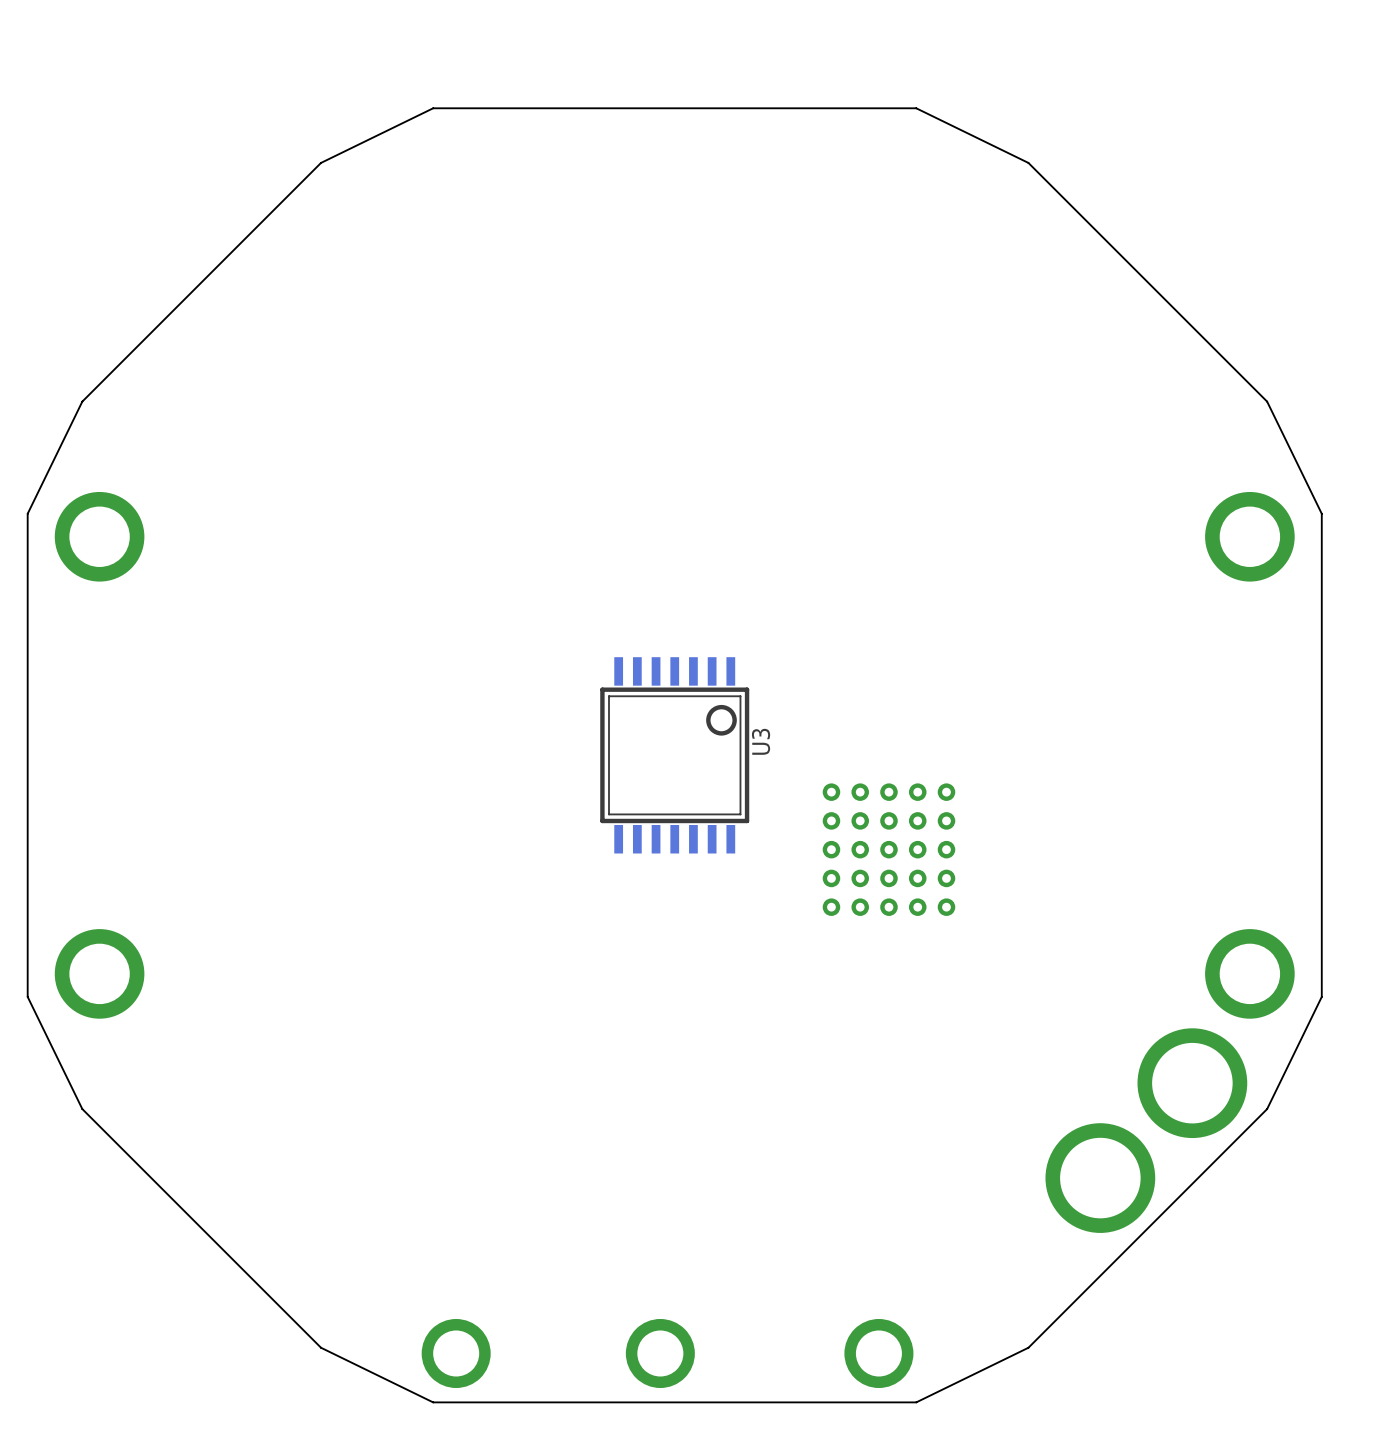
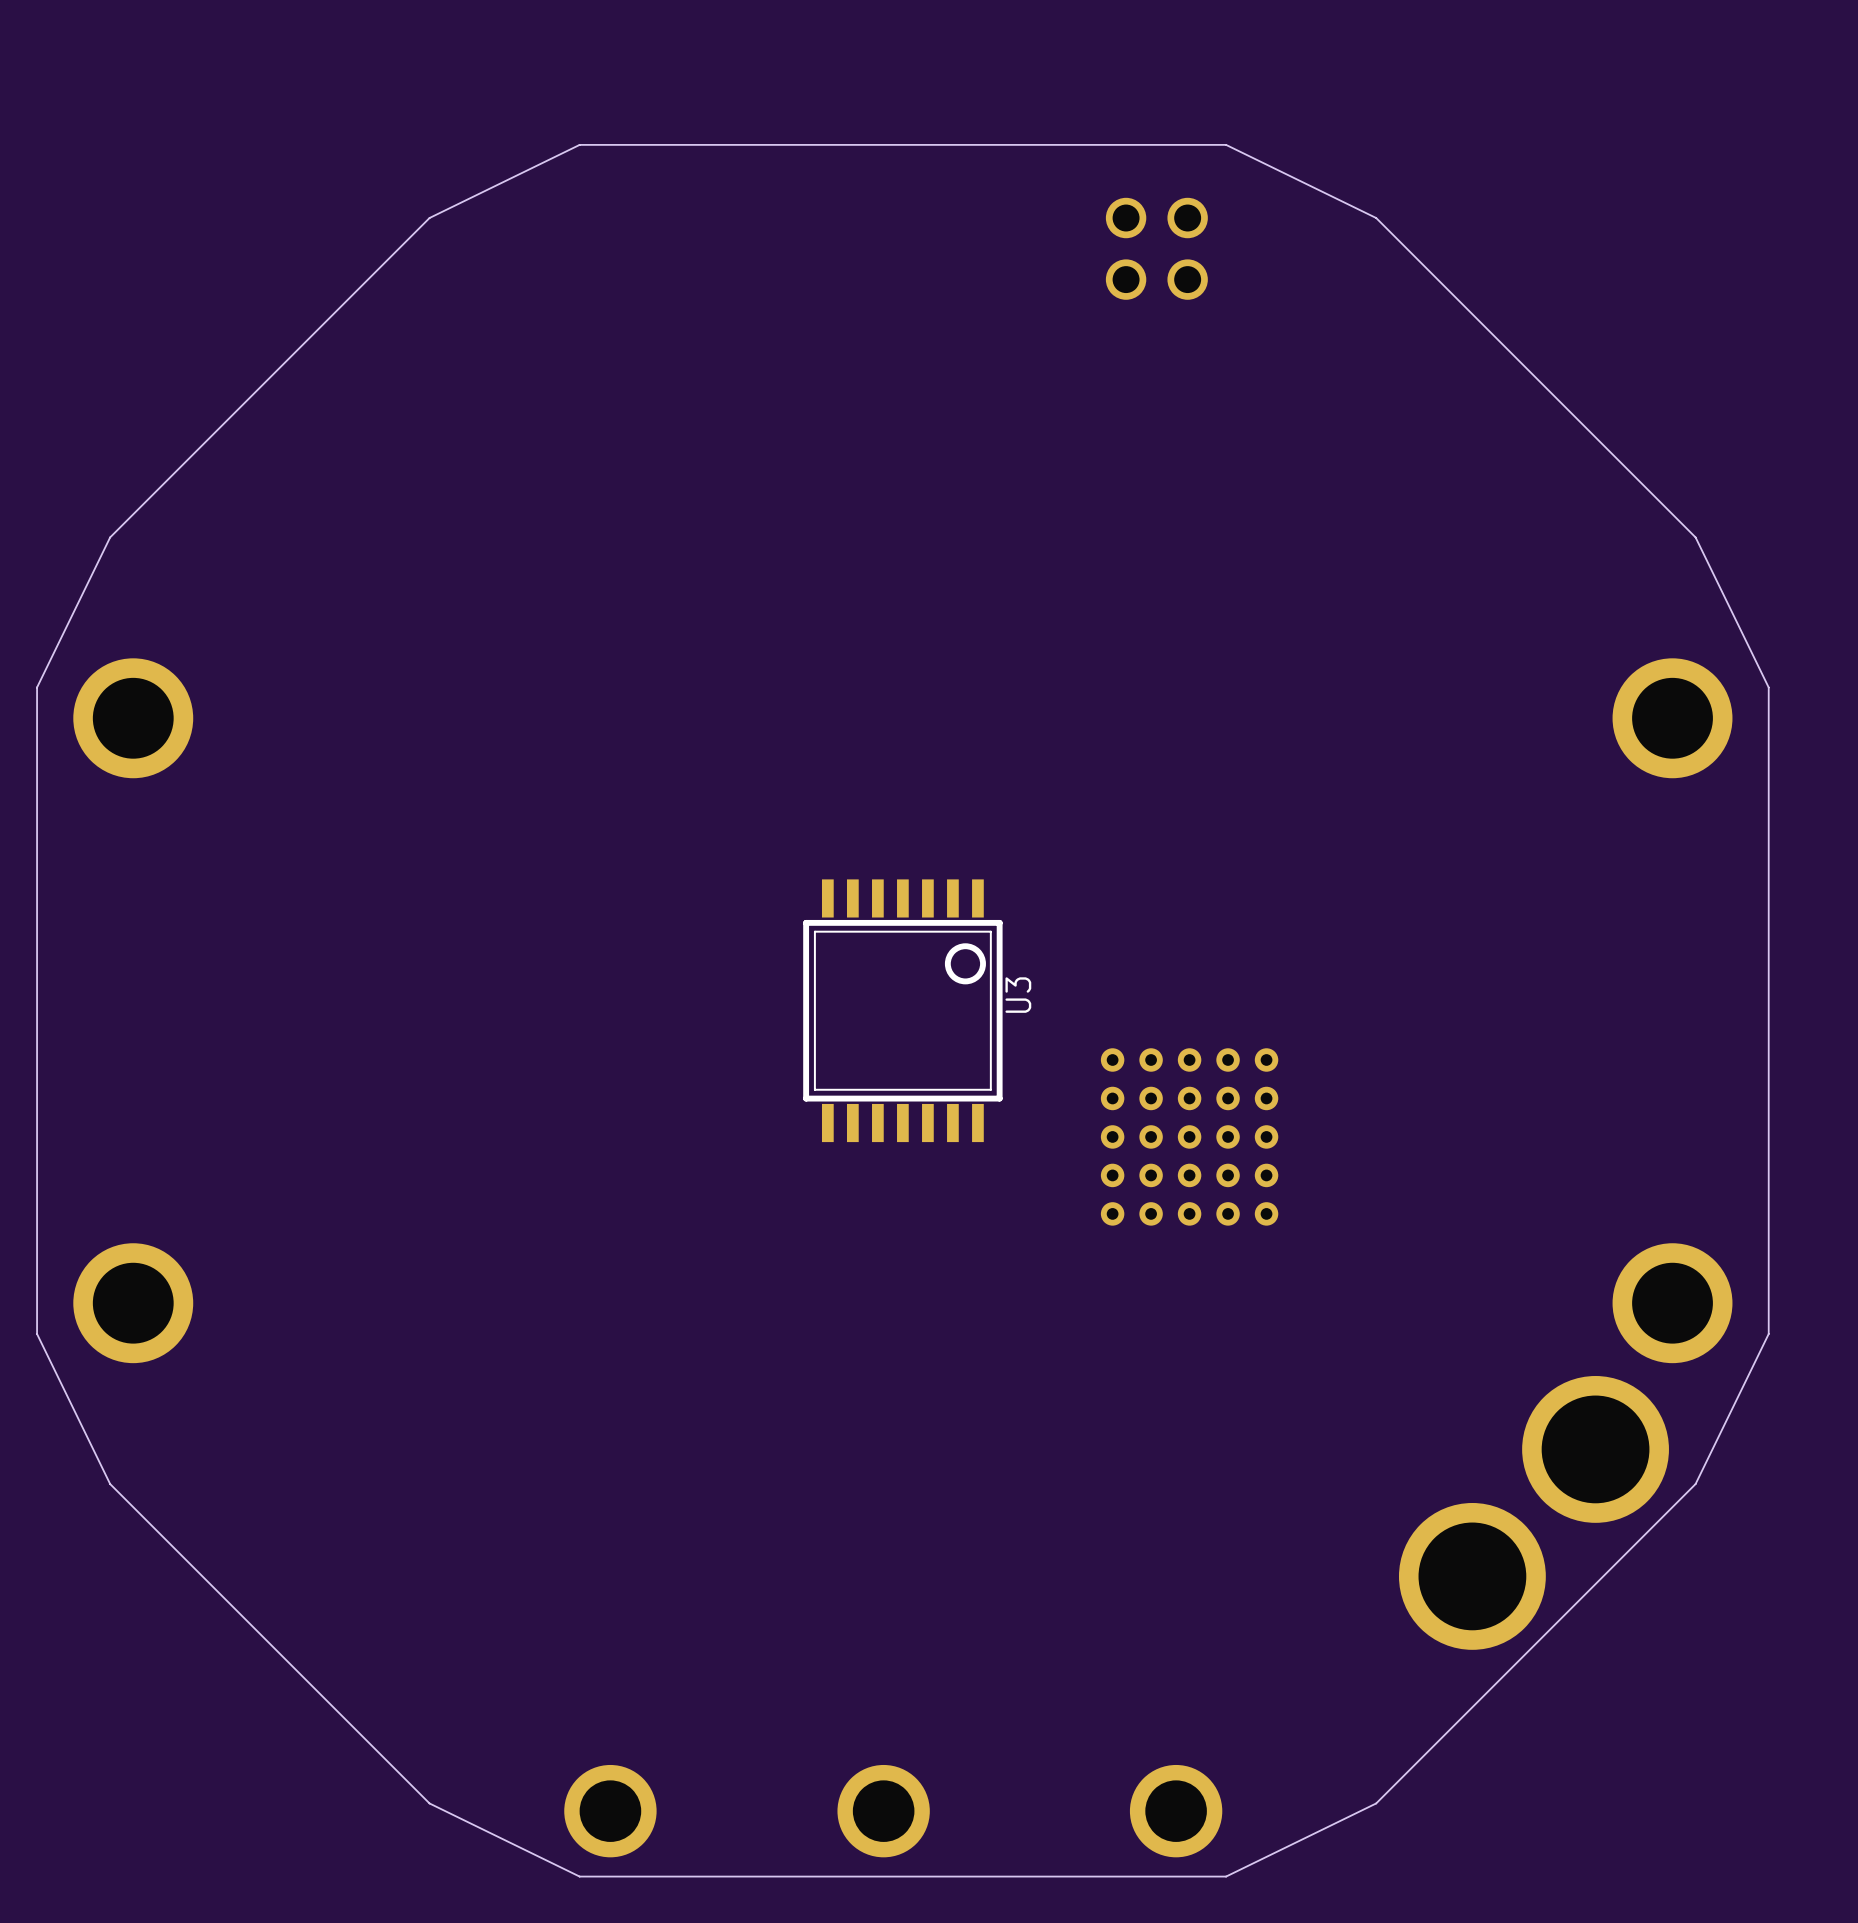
part: none -> (1126, 218)
part: none -> (1187, 218)
part: none -> (1126, 279)
part: none -> (1187, 279)

